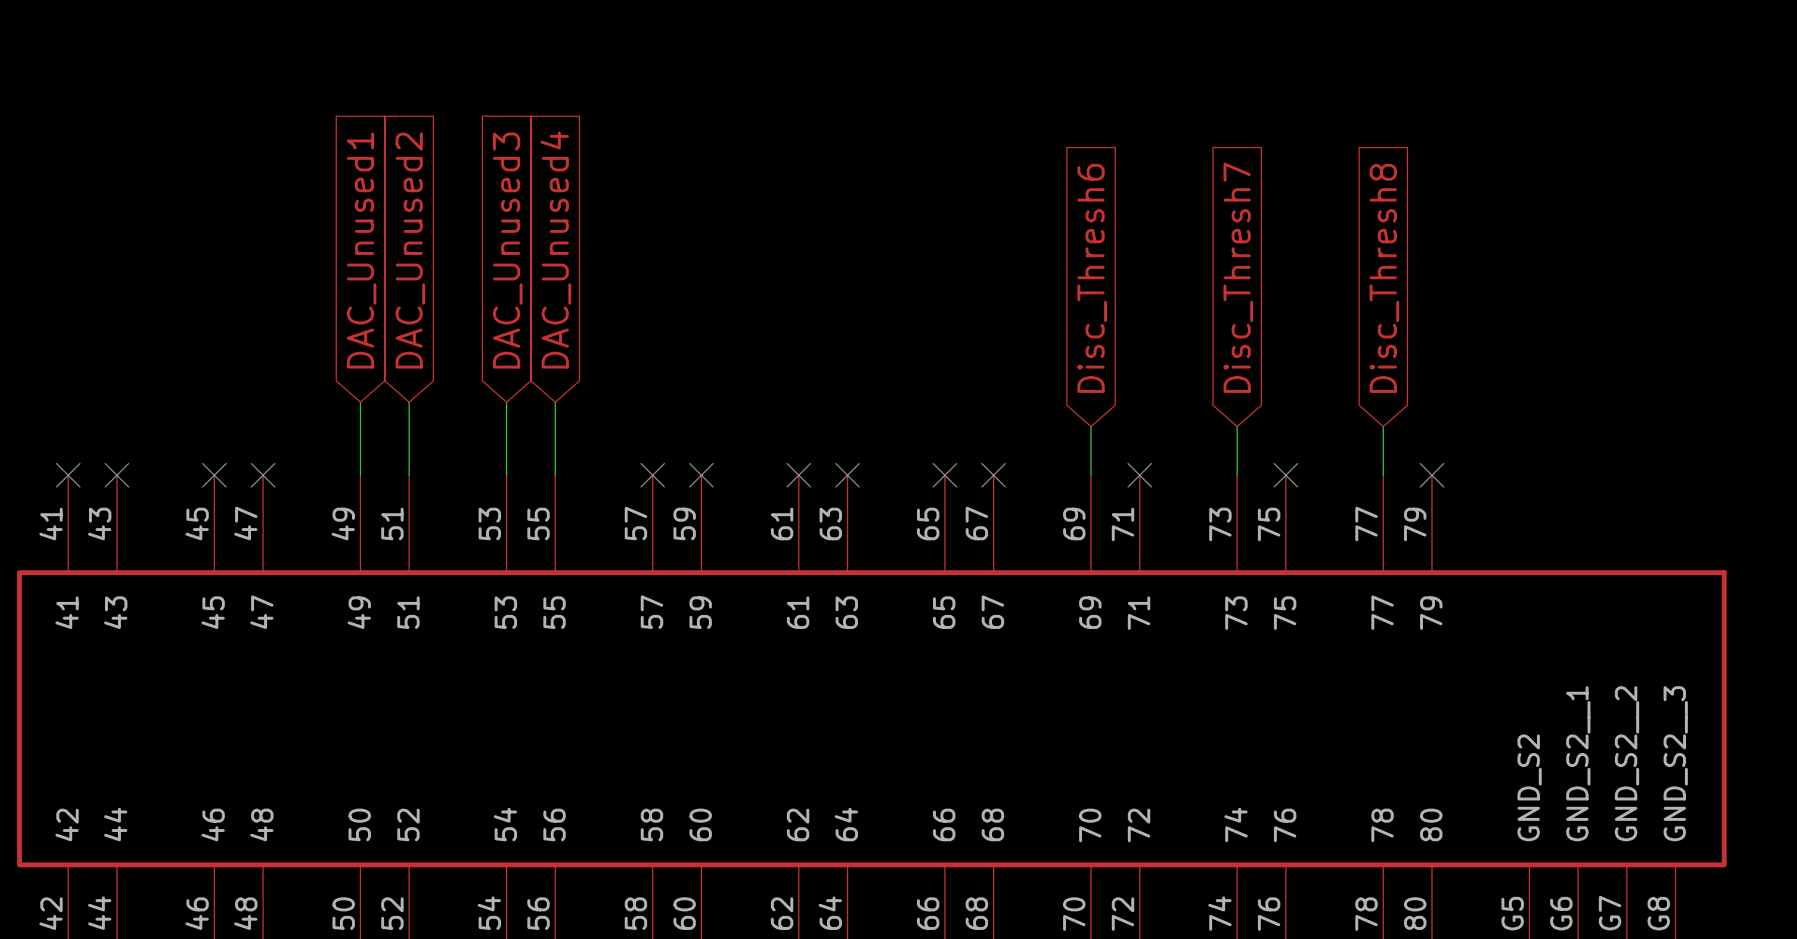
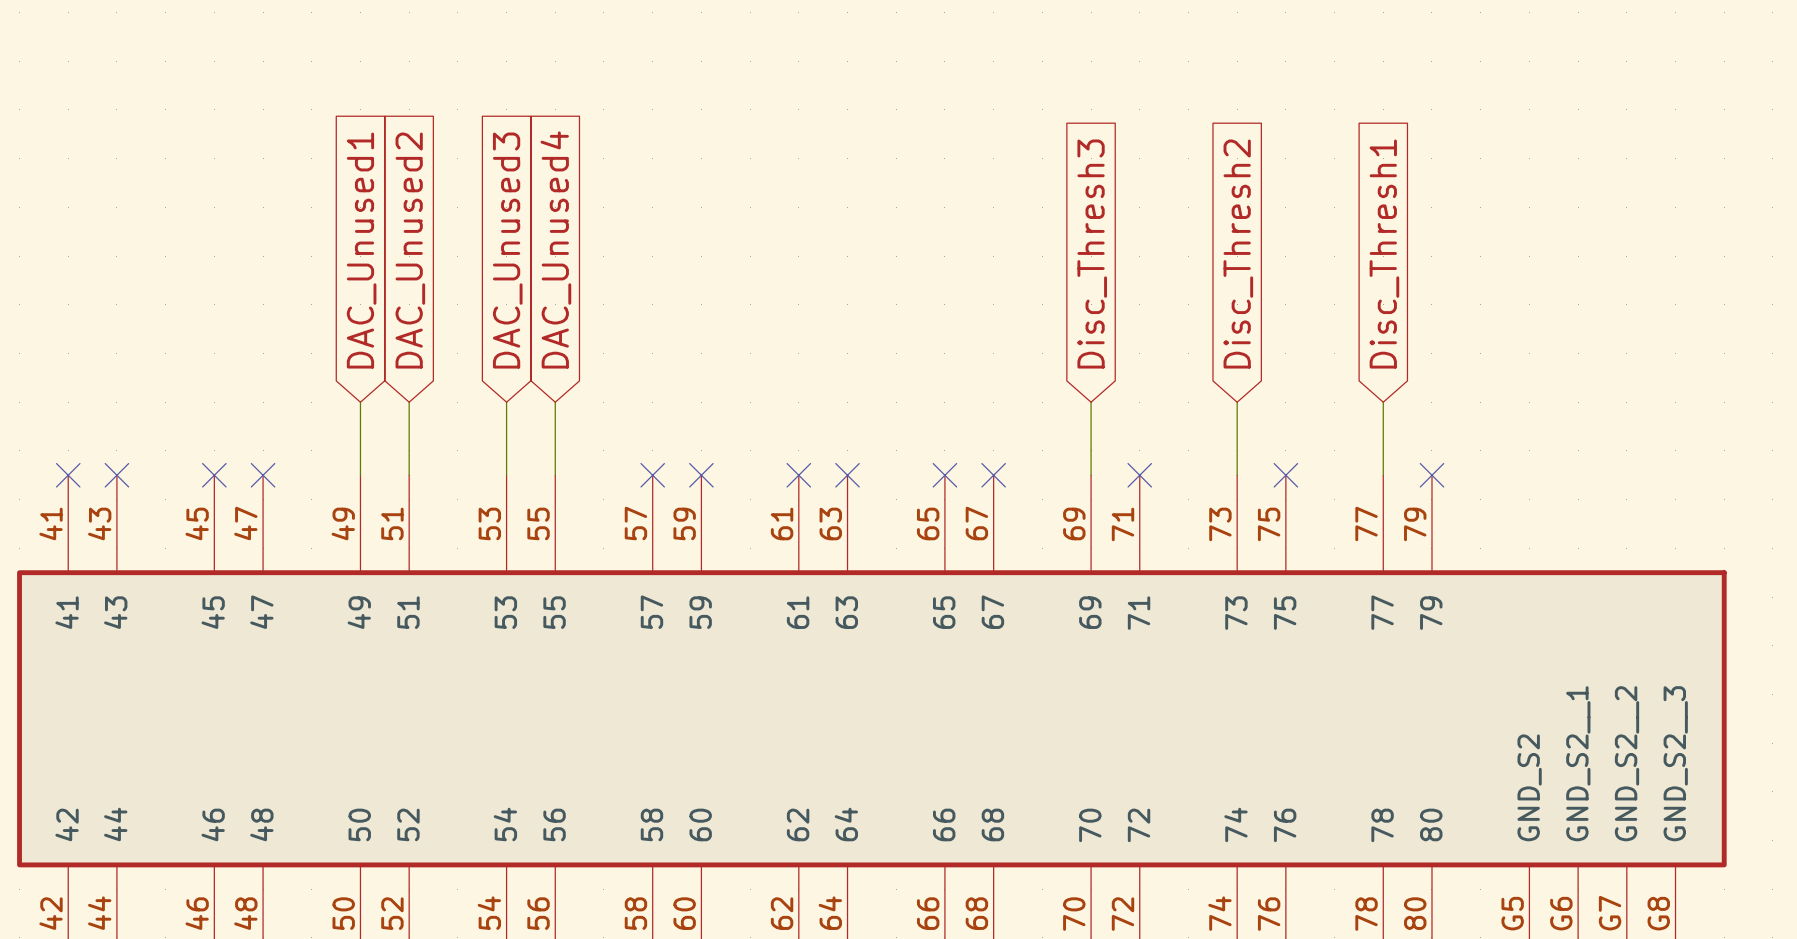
global label: Disc_Thresh7 (1238, 277) -> Disc_Thresh2 (1238, 254)
global label: Disc_Thresh6 (1092, 278) -> Disc_Thresh3 (1092, 254)
global label: Disc_Thresh8 (1384, 278) -> Disc_Thresh1 (1384, 254)
wire: none -> (1091, 402) (1091, 426)
wire: none -> (1237, 402) (1237, 426)
wire: none -> (1383, 402) (1383, 426)

